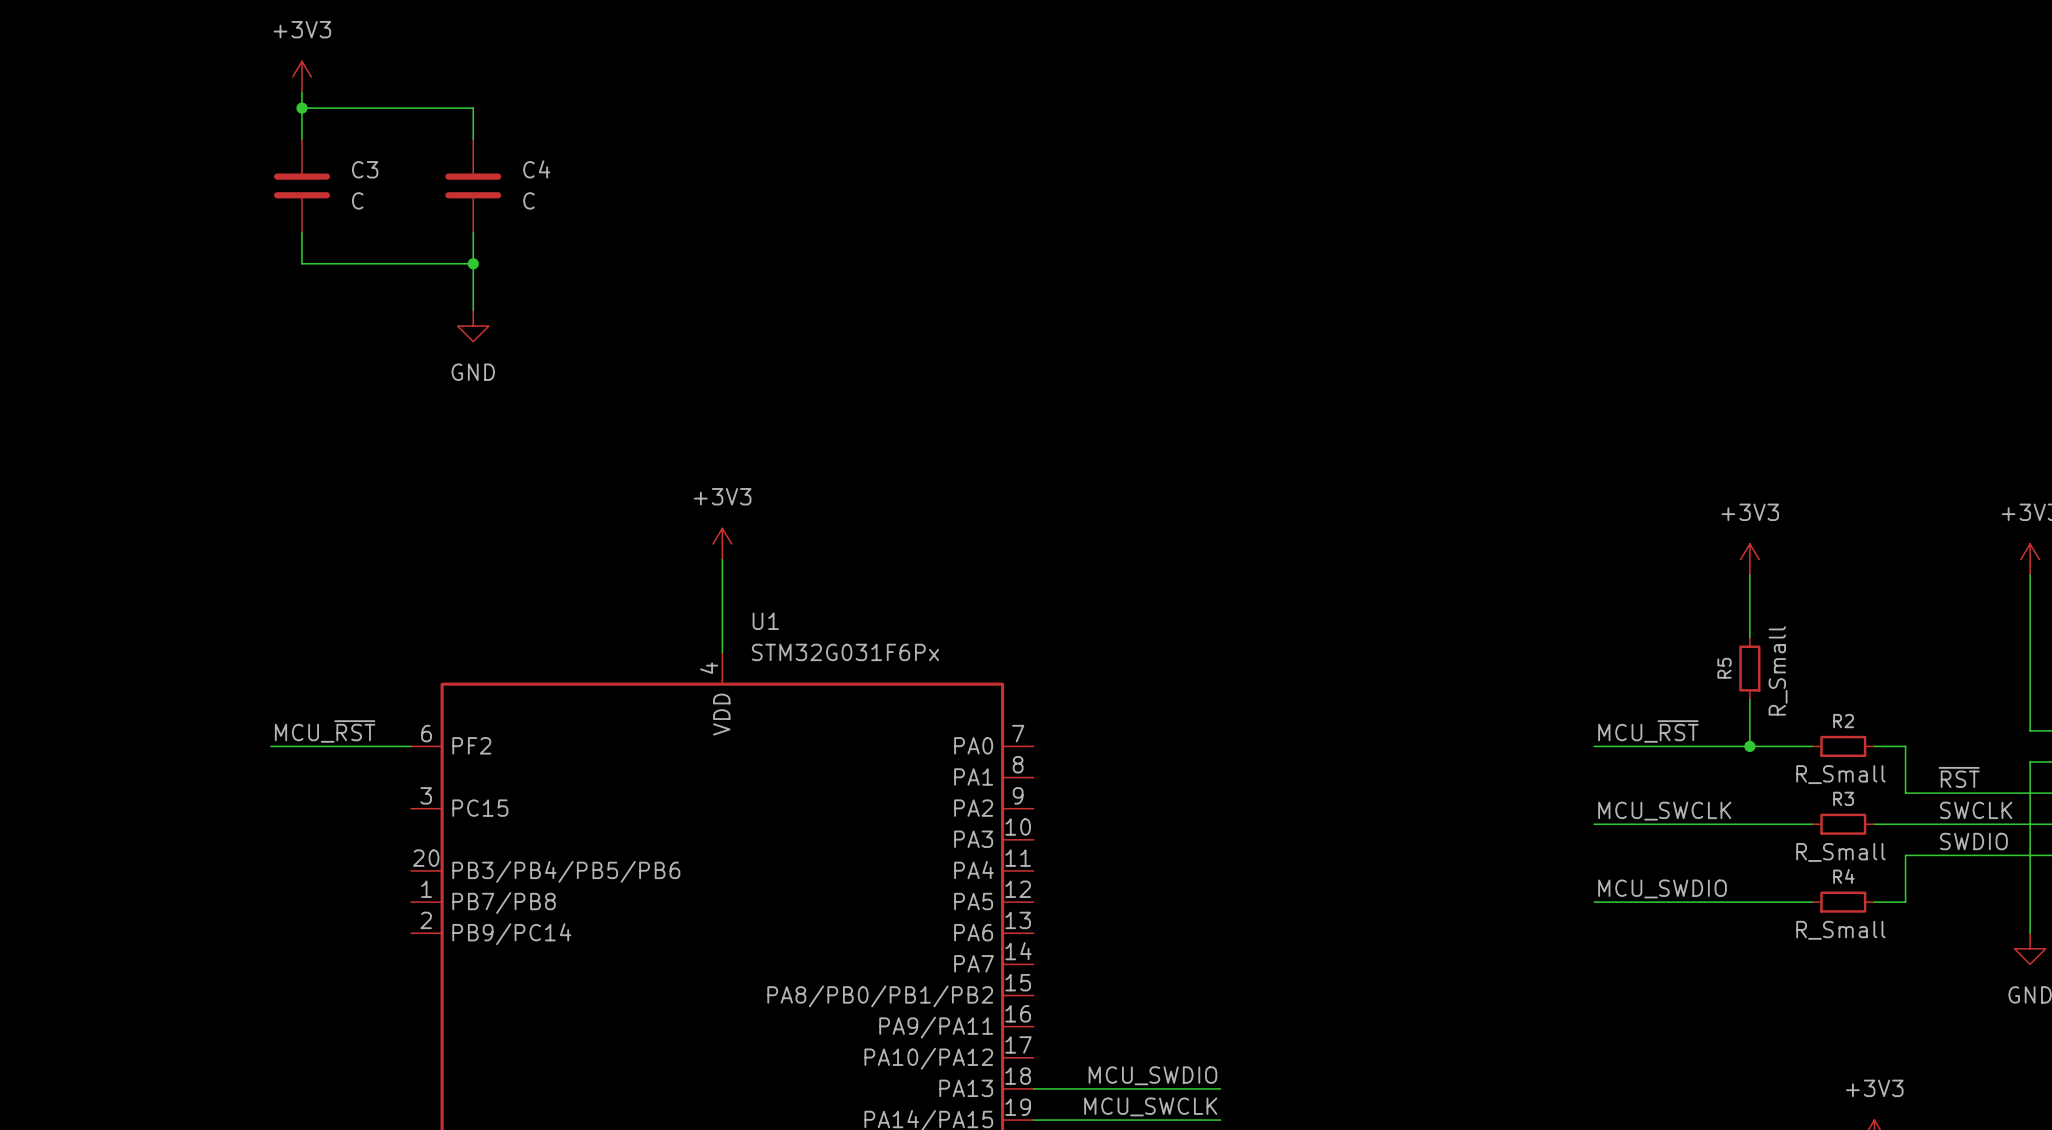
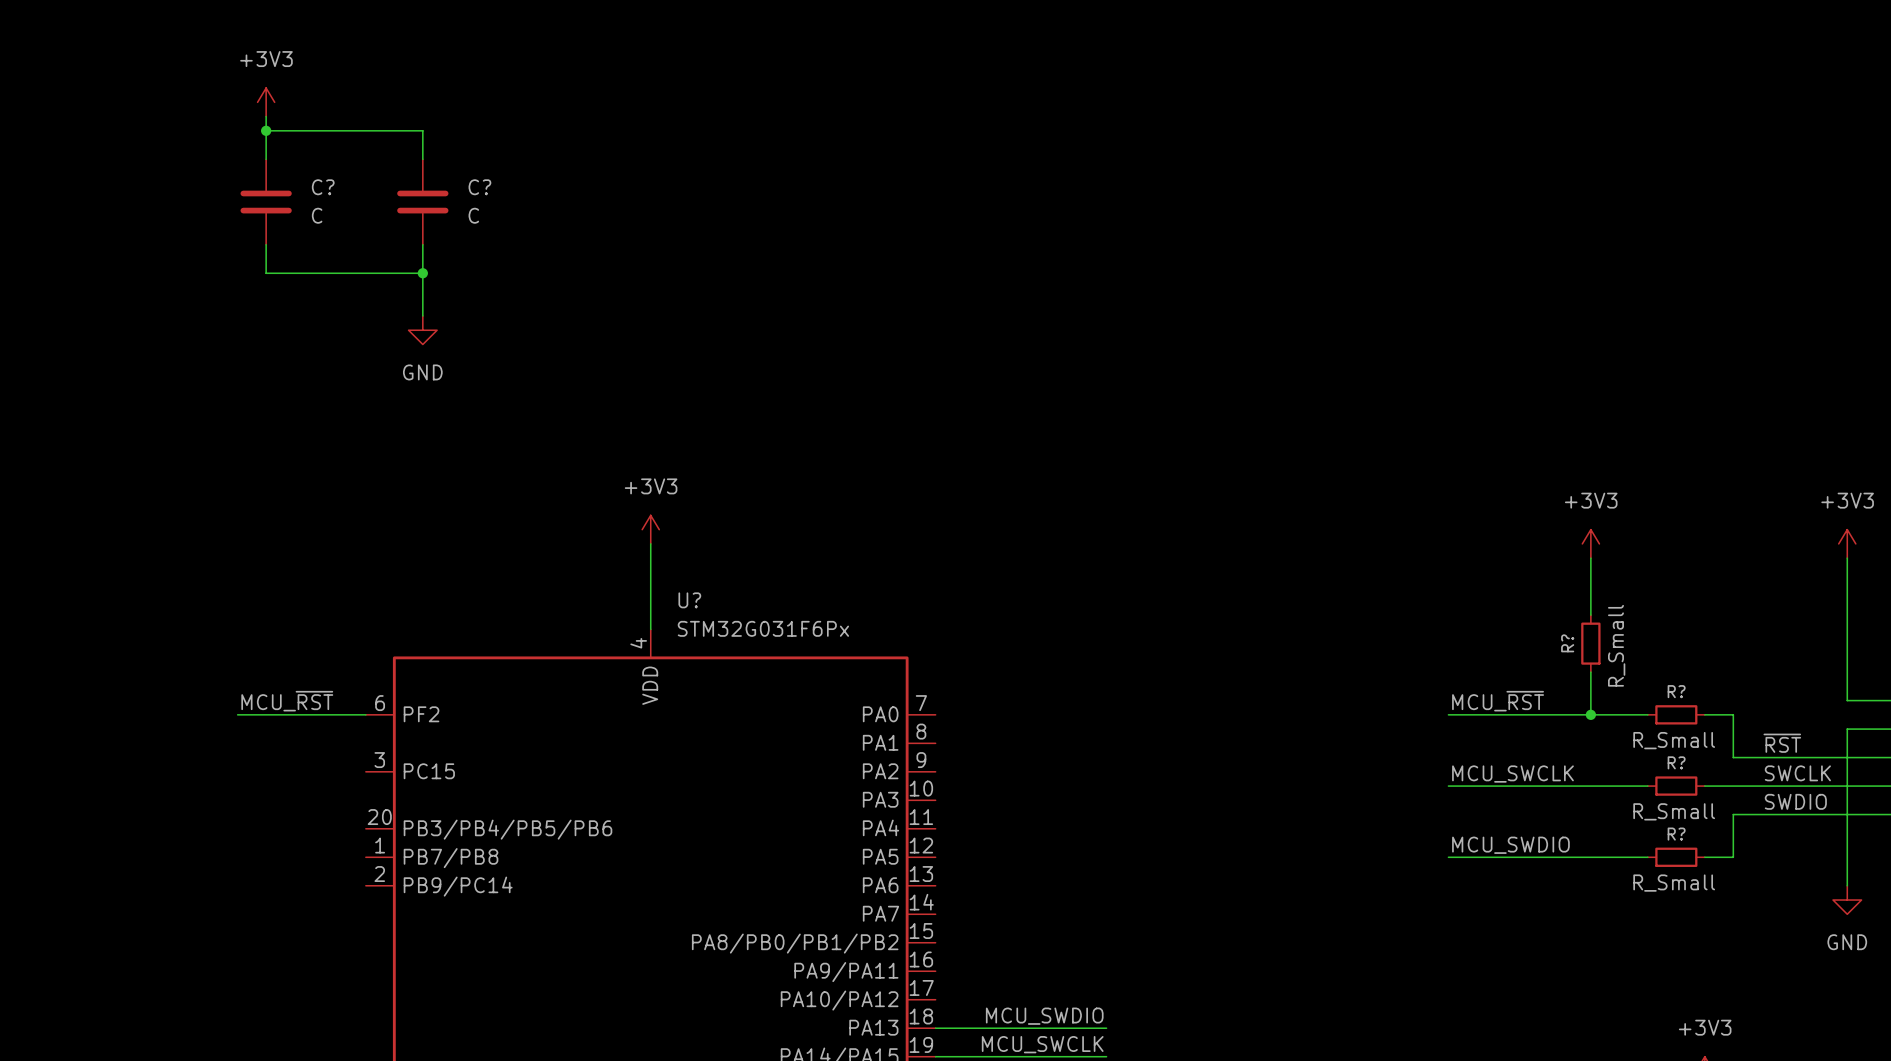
C3 name: C3 (365, 169) -> C? (323, 187)
C4 name: C4 (536, 169) -> C? (479, 187)
U1 name: U1 (765, 621) -> U? (689, 600)
R5 name: R5 (1724, 668) -> R? (1567, 643)
R2 name: R2 (1843, 721) -> R? (1676, 691)
R3 name: R3 (1843, 798) -> R? (1676, 762)
R4 name: R4 (1843, 876) -> R? (1676, 834)

